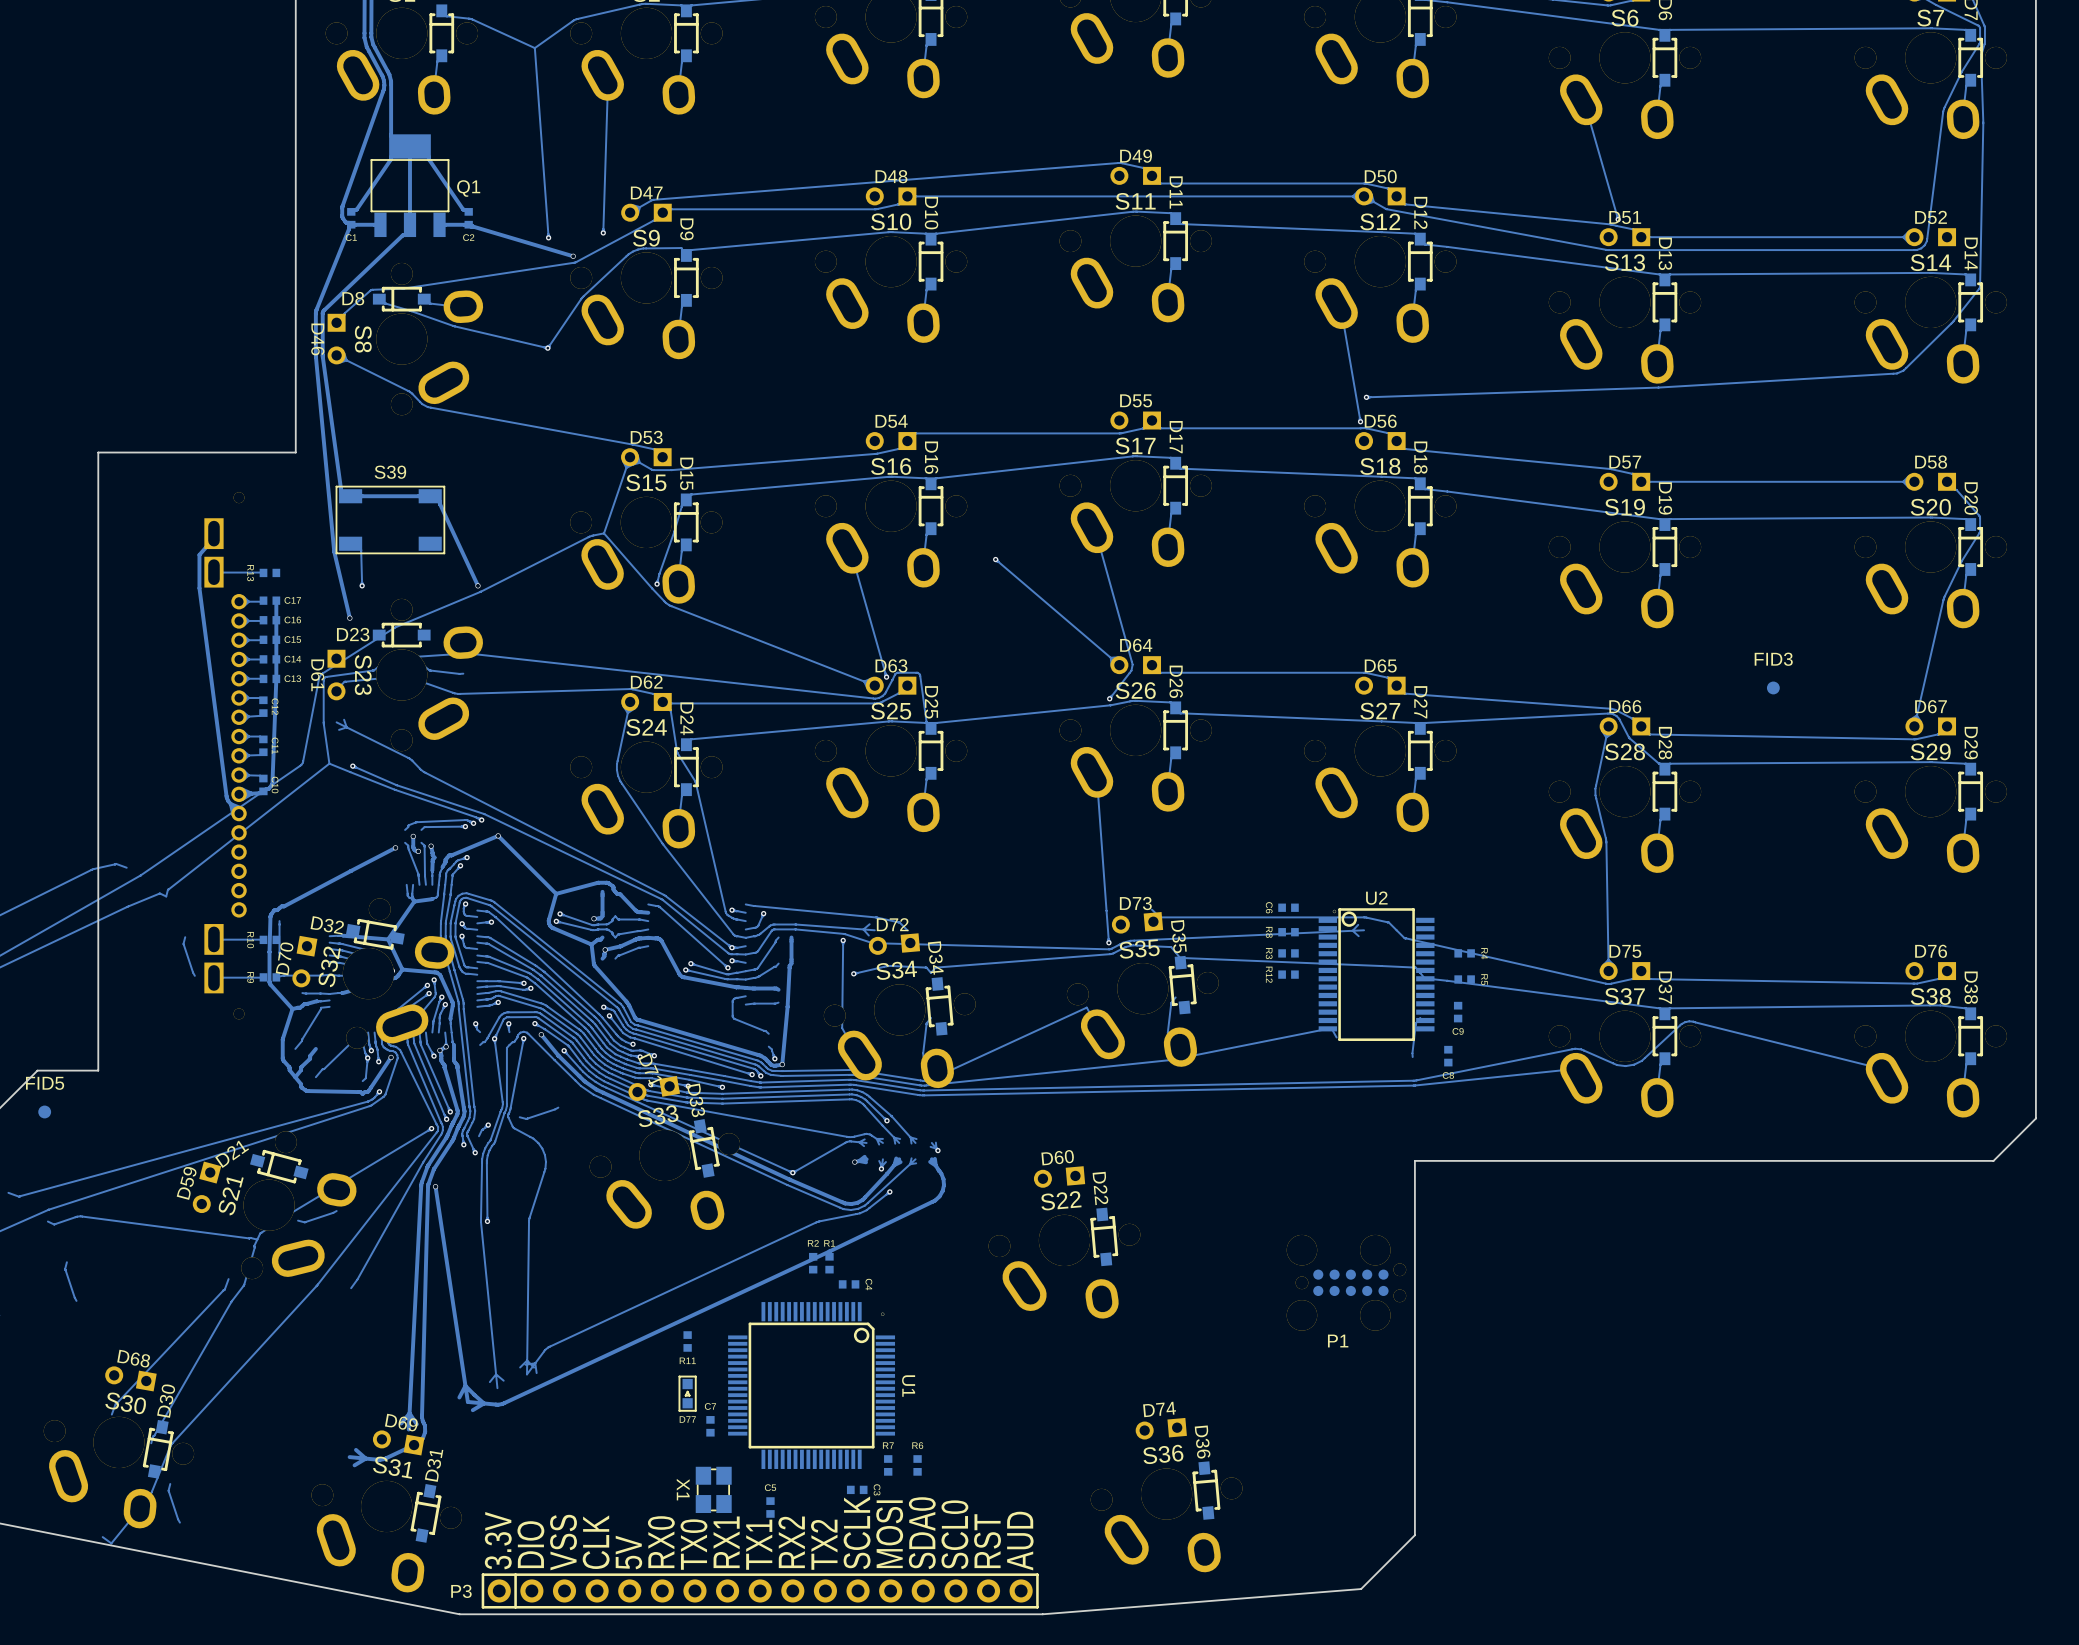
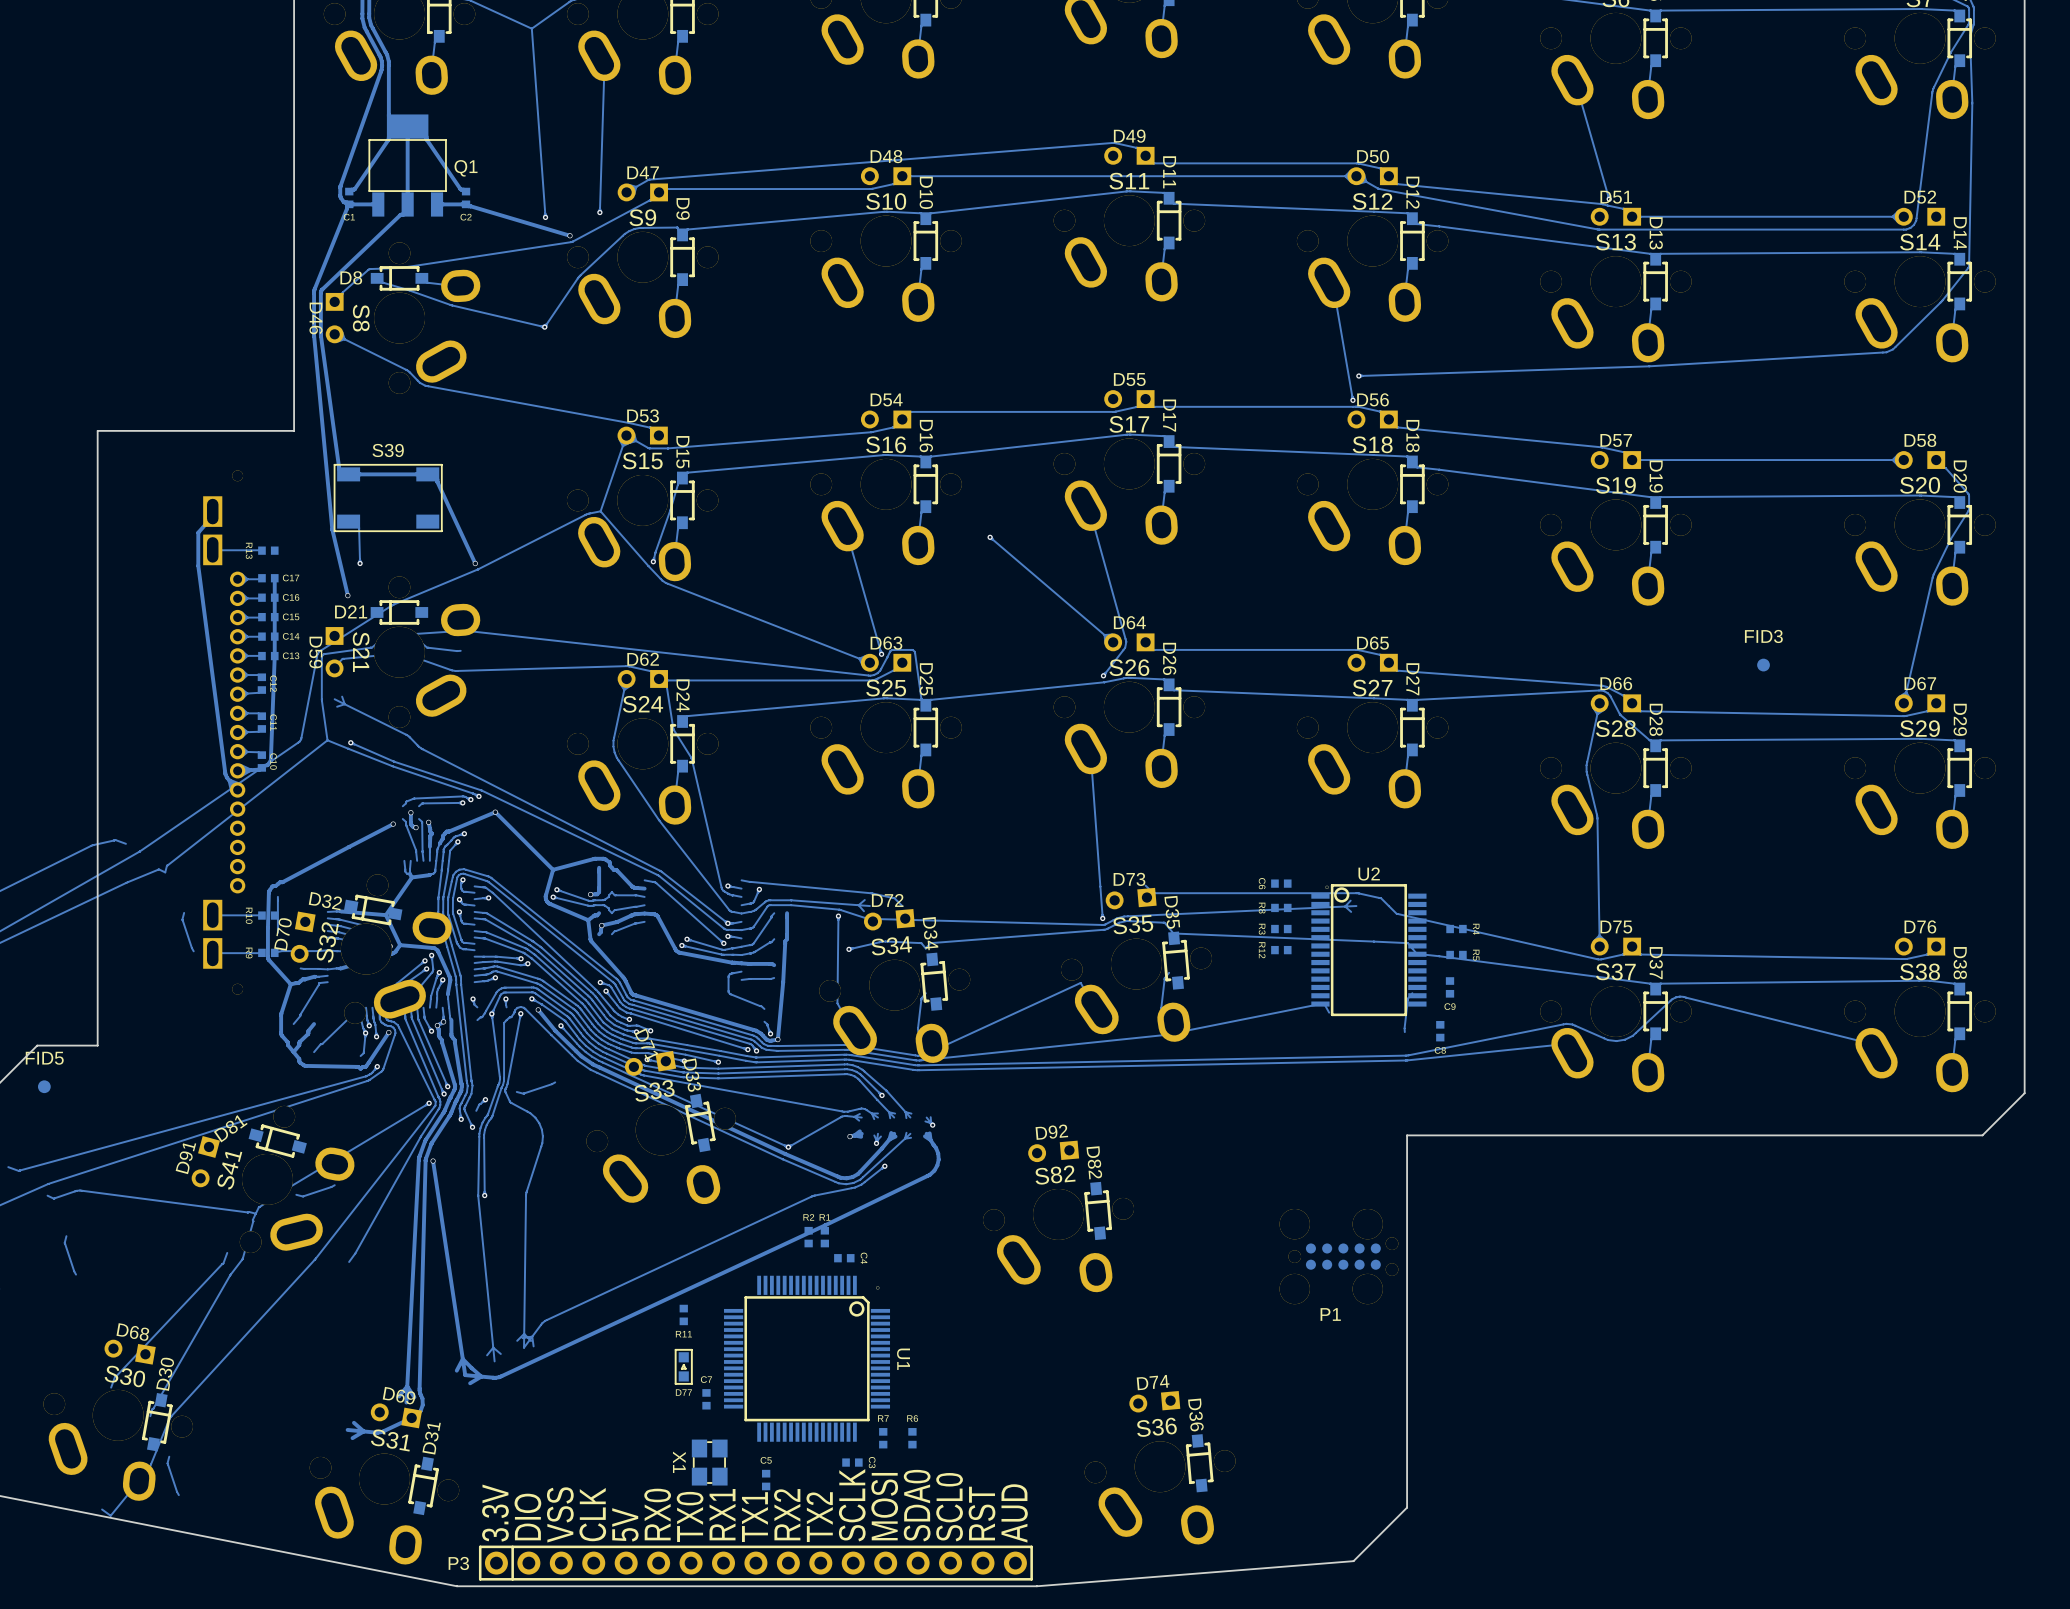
D23 name: D23 (353, 634) -> D21 (351, 611)
D61 name: D61 (317, 675) -> D59 (315, 652)
S23 name: S23 (363, 675) -> S21 (361, 652)
D21 name: D21 (232, 1154) -> D81 (230, 1128)
D60 name: D60 (1057, 1157) -> D92 (1051, 1132)
D59 name: D59 (186, 1183) -> D91 (185, 1158)
D22 name: D22 (1100, 1188) -> D82 (1094, 1162)
S21 name: S21 (231, 1196) -> S41 (229, 1170)
S22 name: S22 (1061, 1200) -> S82 (1055, 1175)

